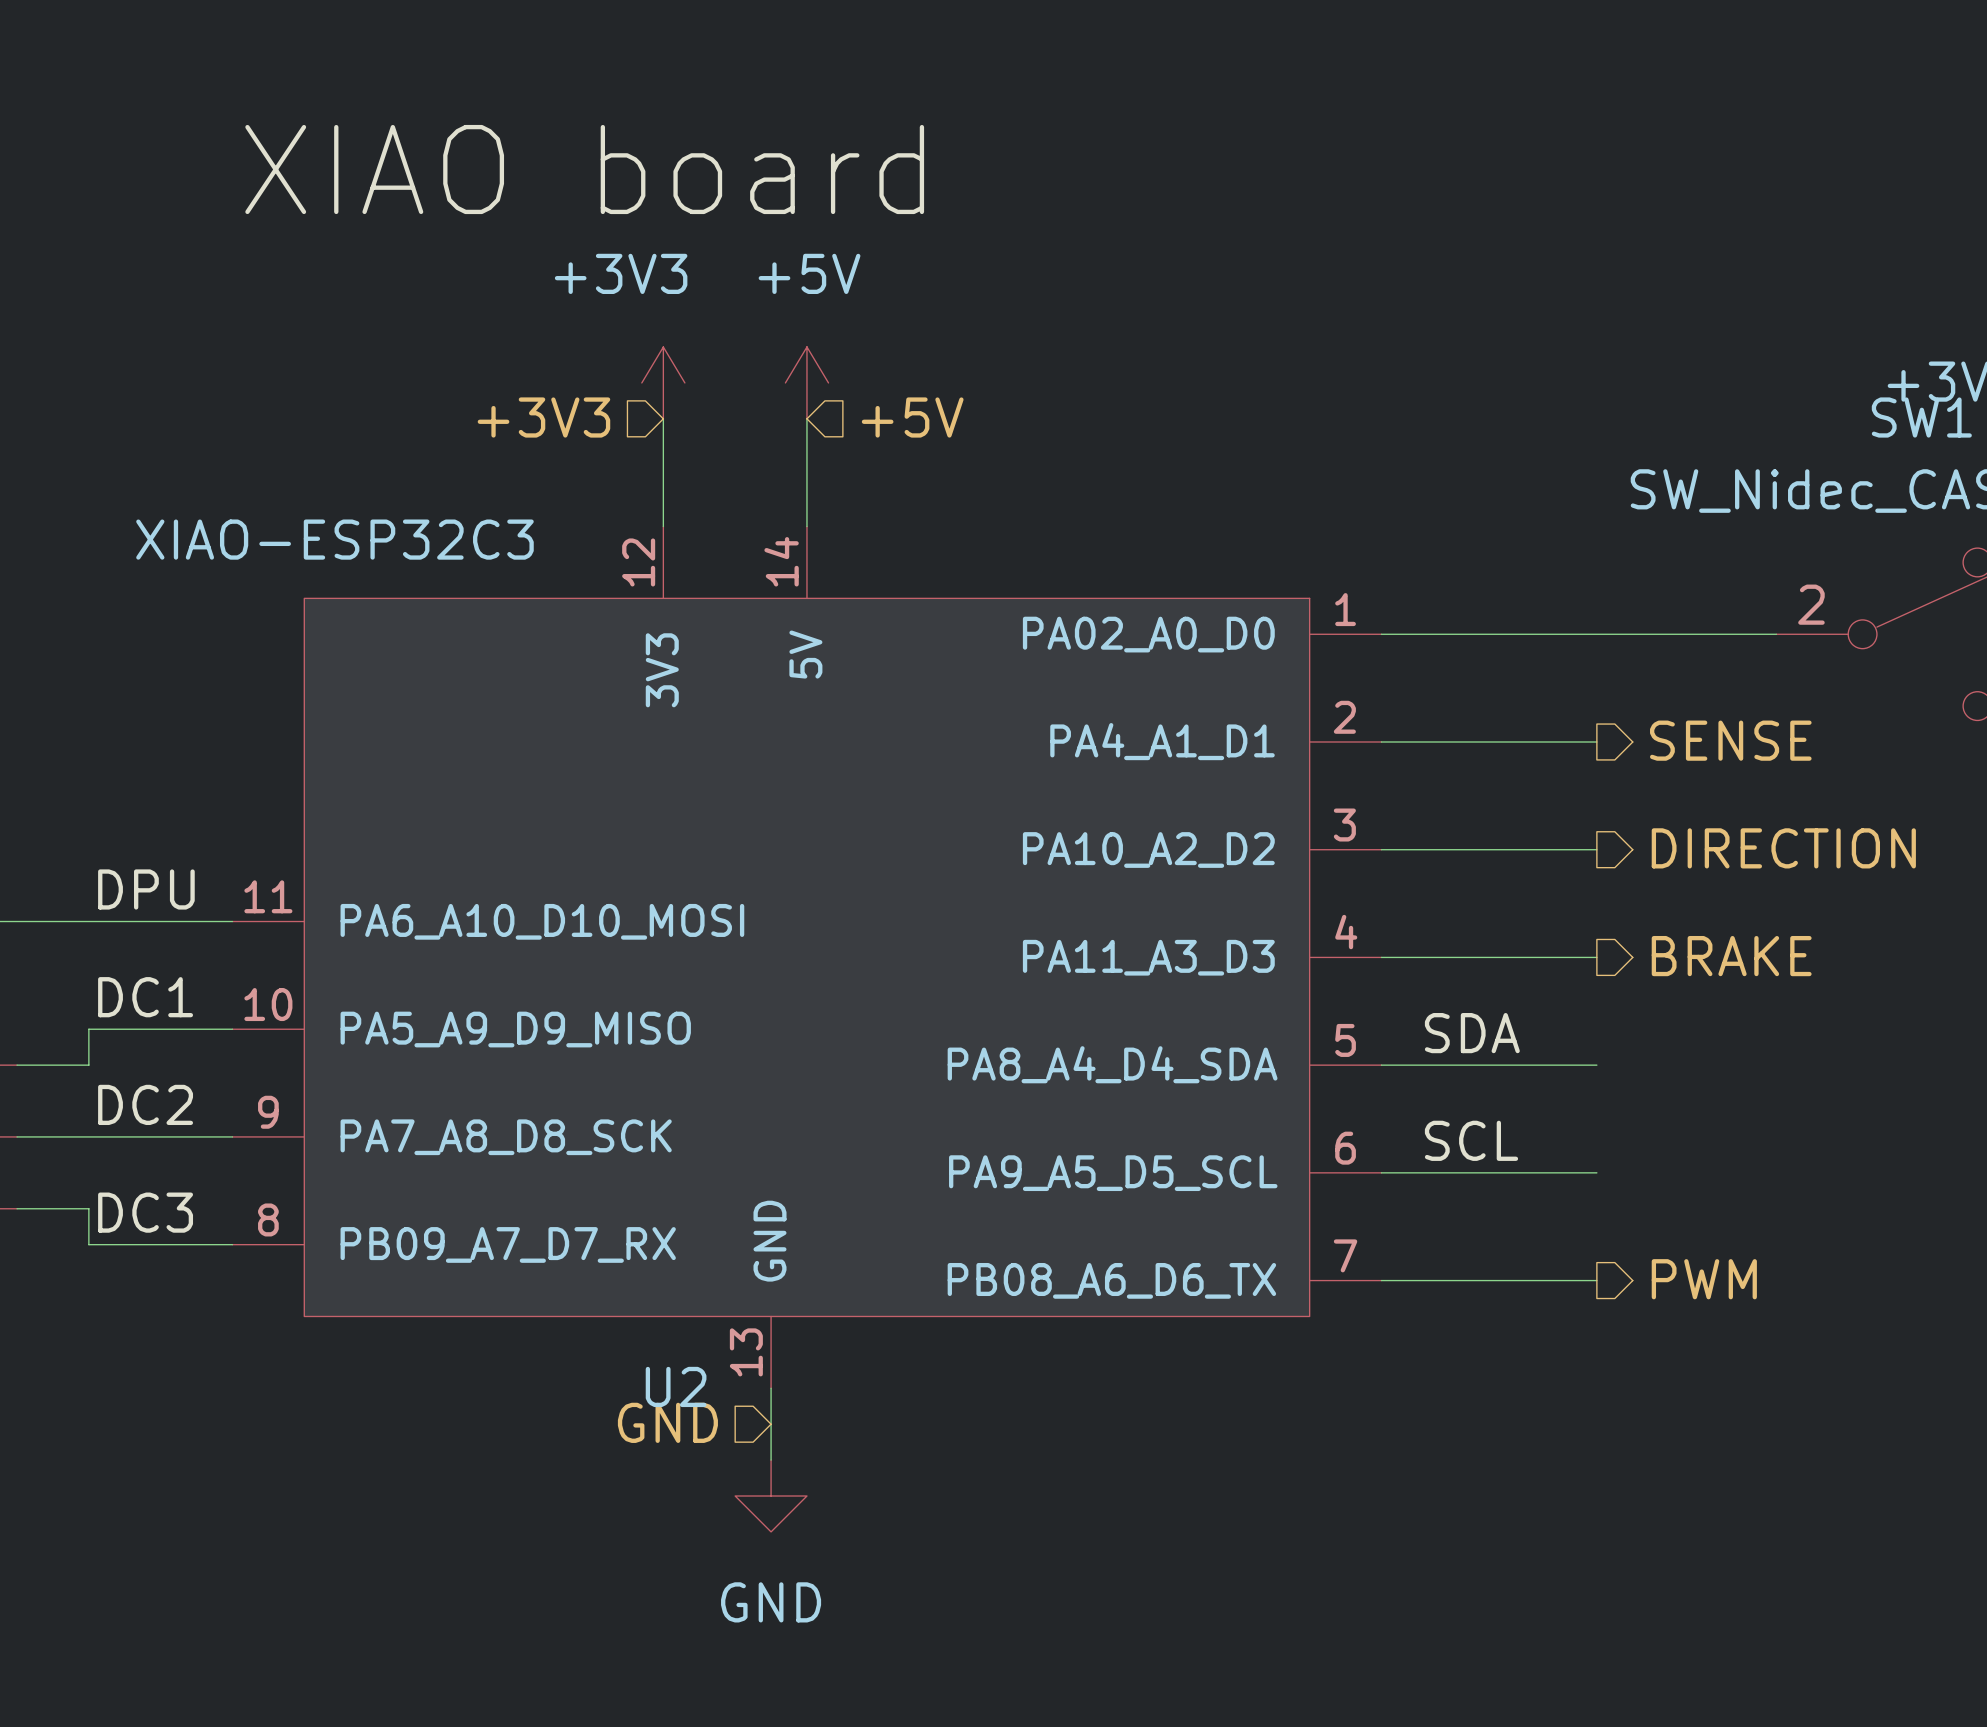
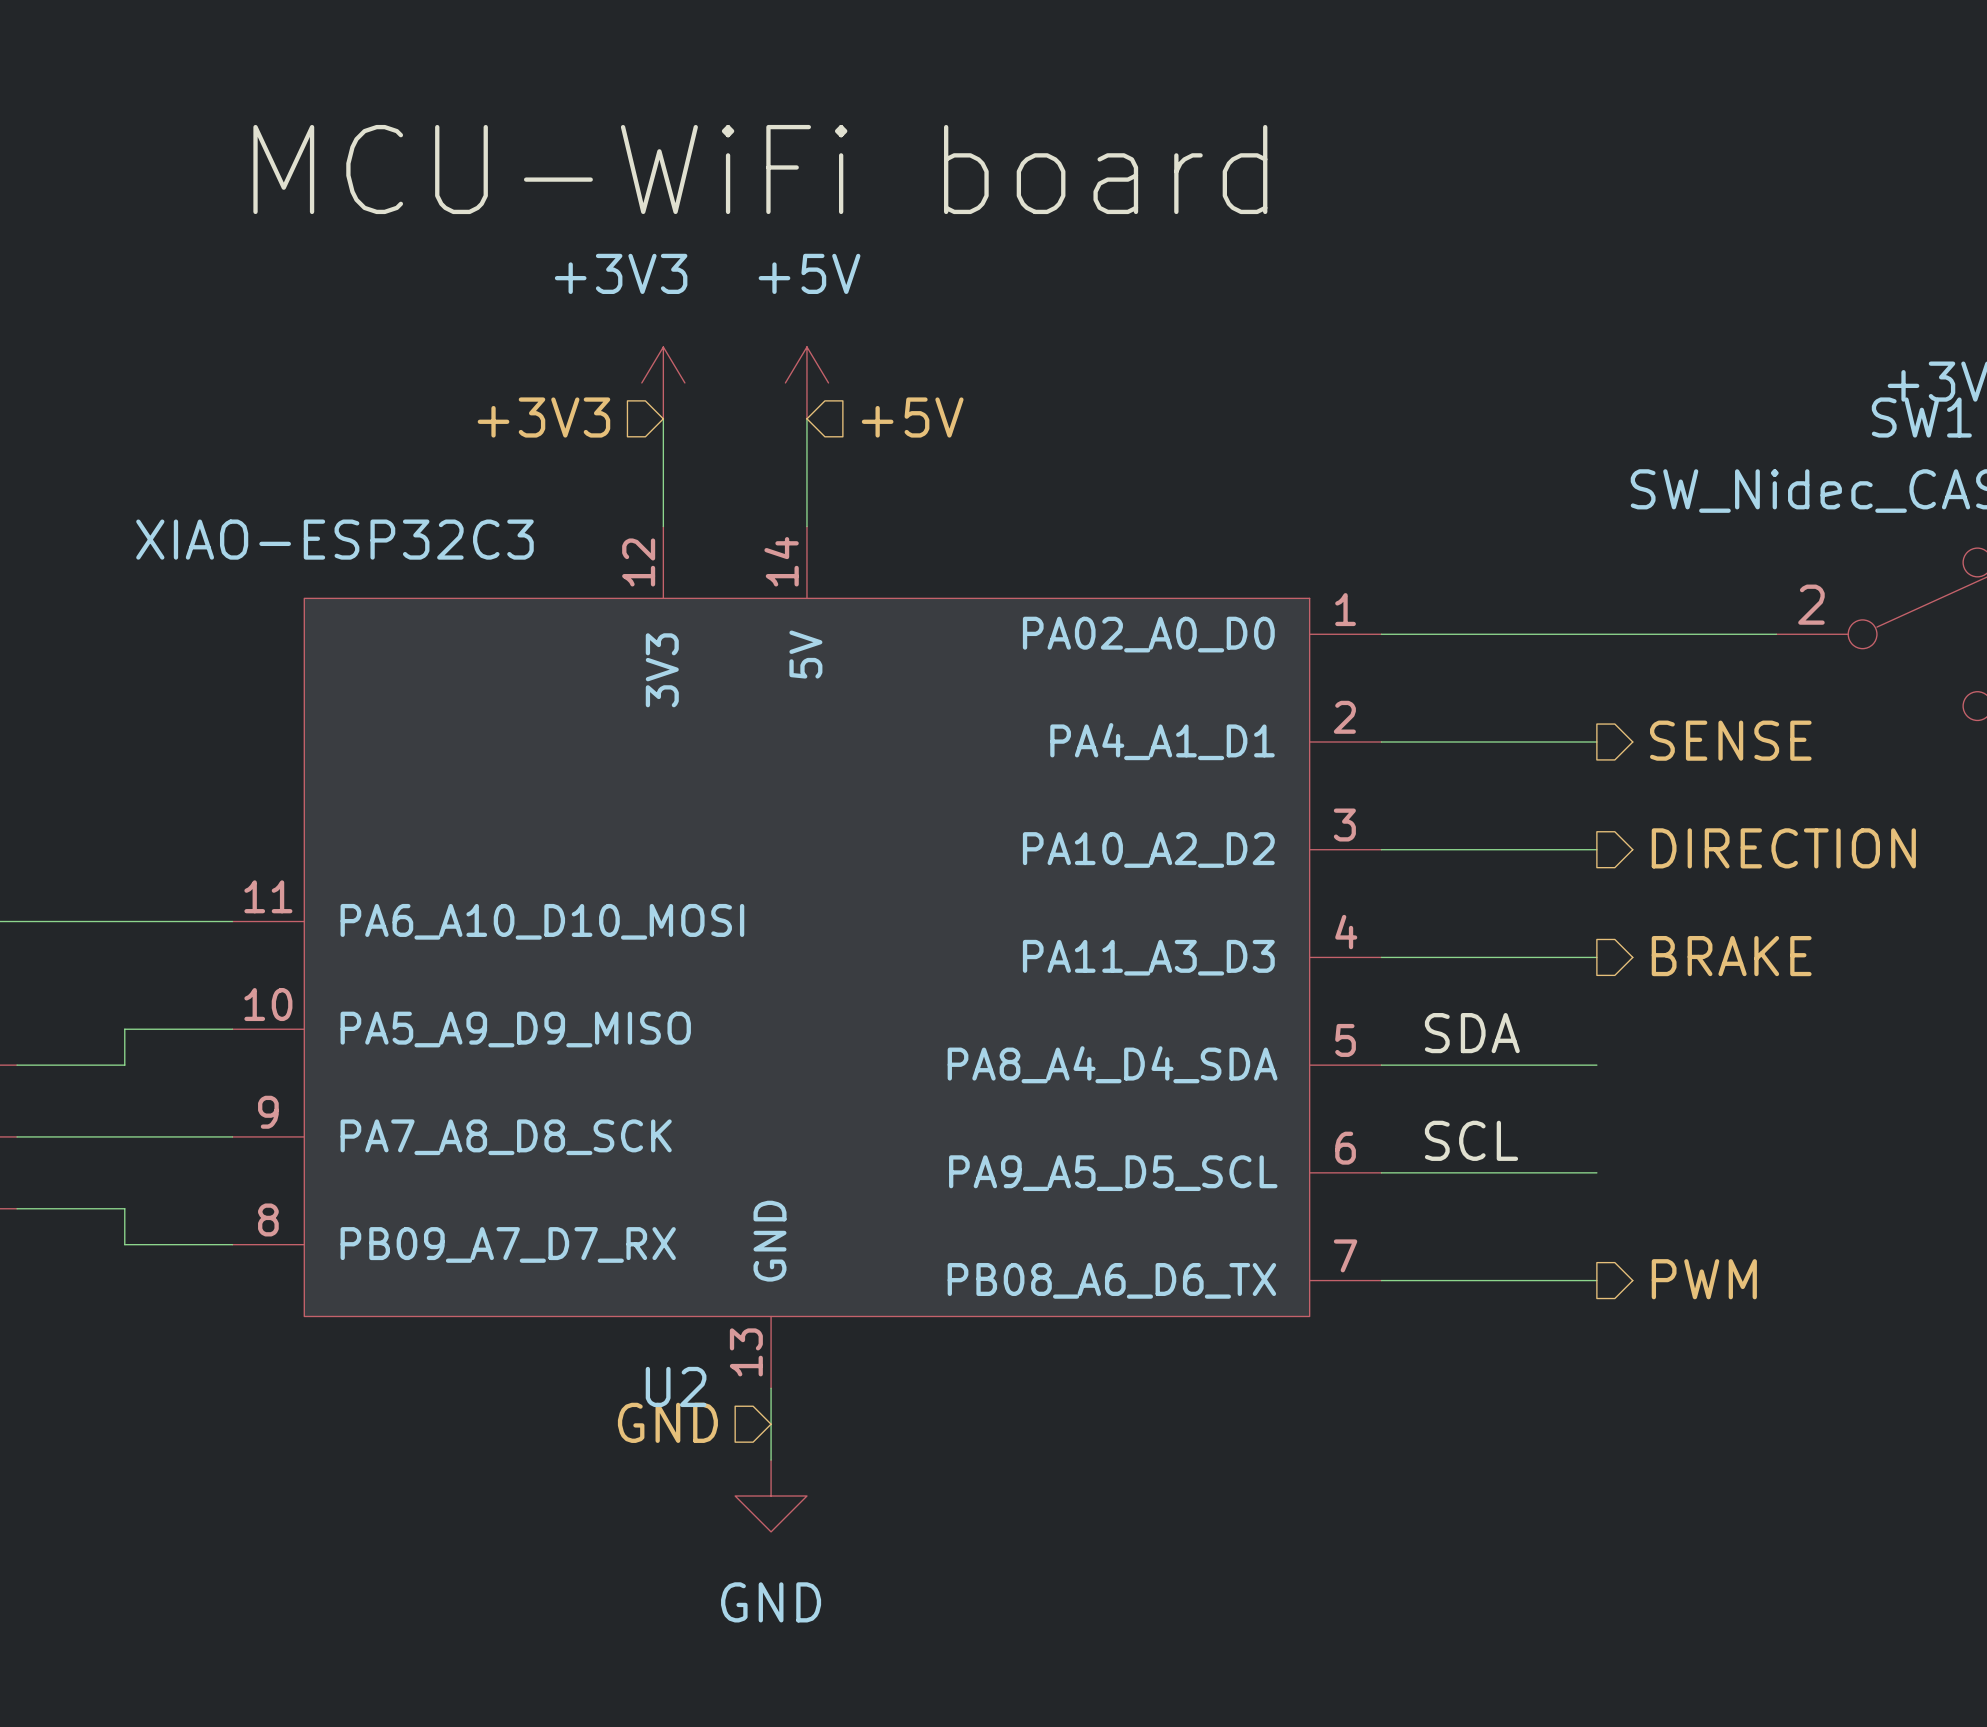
label: XIAO board (584, 169) -> MCU-WiFi board (760, 169)
label: DPU (146, 889) -> none
label: DC1 (145, 997) -> none
wire: (124, 1029) (88, 1029) (88, 1065) -> (124, 1029) (124, 1065) (88, 1065)
label: DC2 (145, 1104) -> none
wire: (88, 1208) (88, 1244) (124, 1244) -> (88, 1208) (124, 1208) (124, 1244)
label: DC3 (145, 1212) -> none

